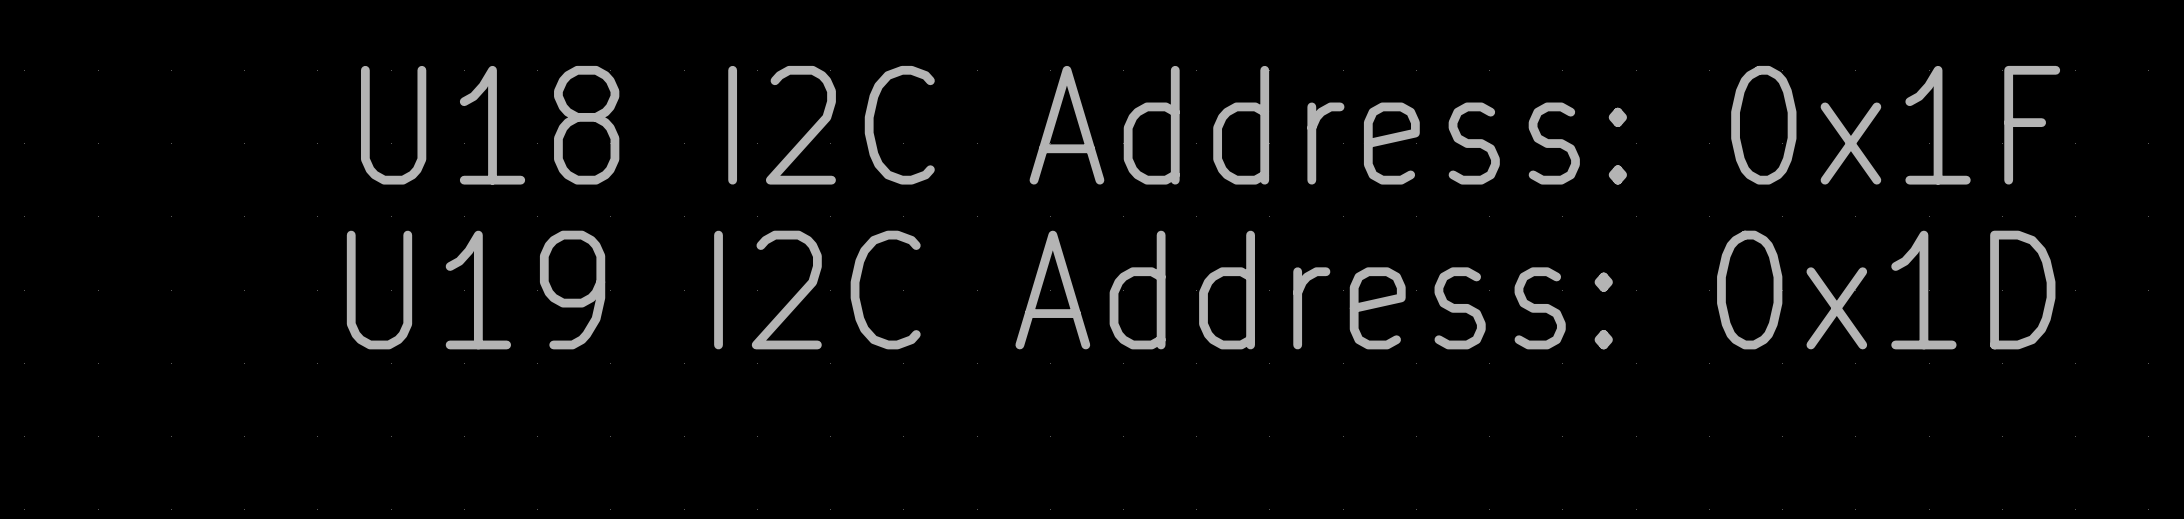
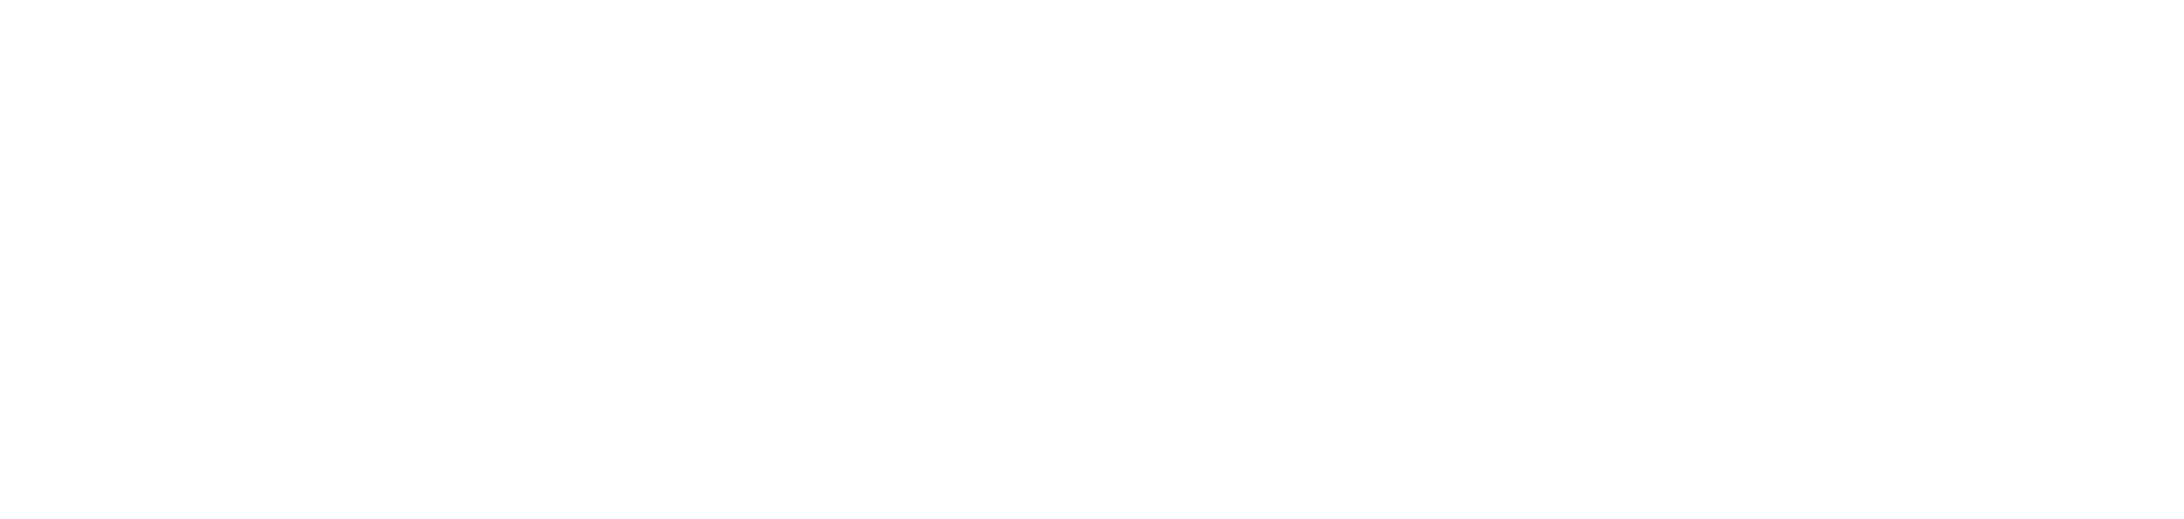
text: U18 I2C Address: 0x1F (1210, 125) -> none
text: U19 I2C Address: 0x1D (1201, 290) -> none

